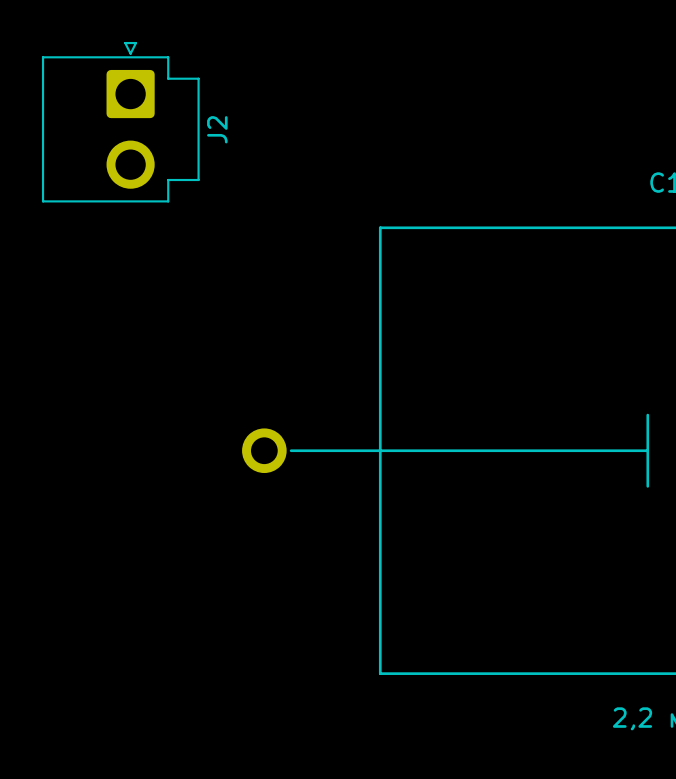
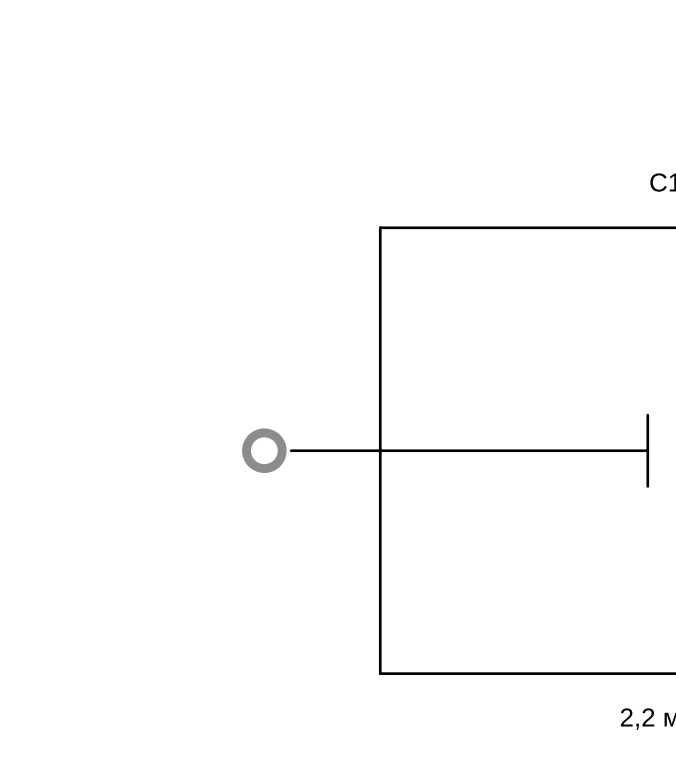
J2: (120, 122) -> none

